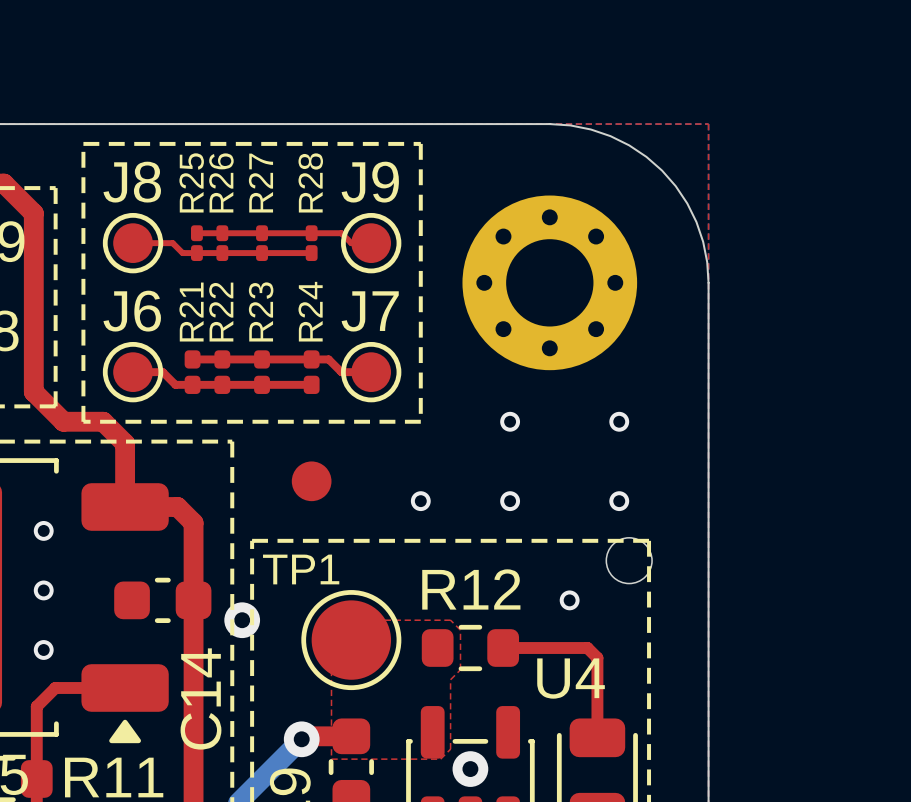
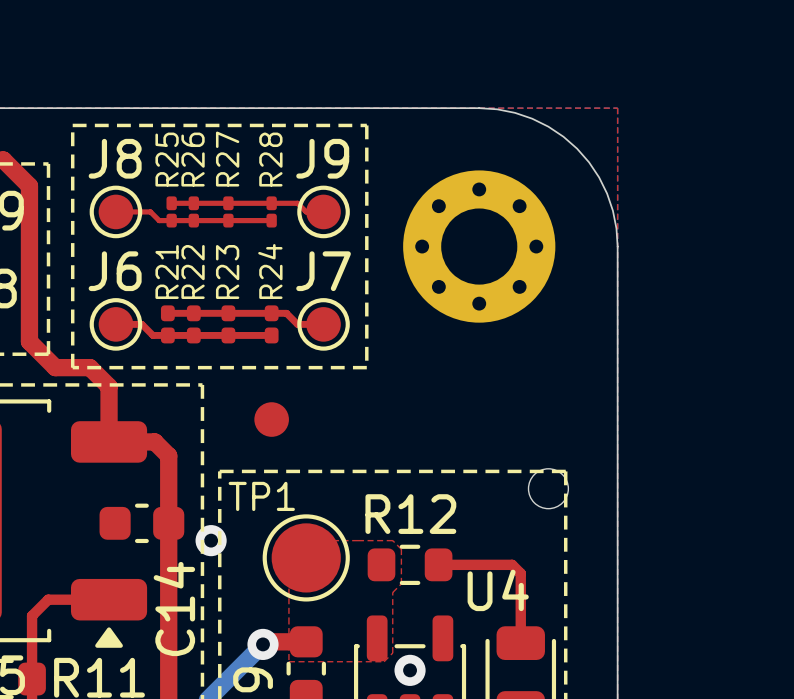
via: (510, 421) -> none
via: (619, 421) -> none
via: (420, 501) -> none
via: (510, 501) -> none
via: (619, 501) -> none
via: (43, 530) -> none
via: (43, 590) -> none
via: (569, 600) -> none
via: (43, 649) -> none

